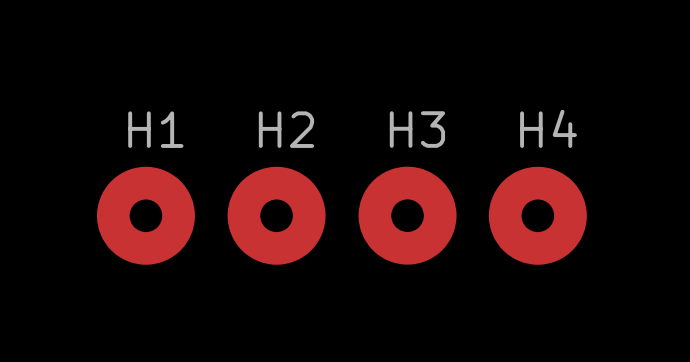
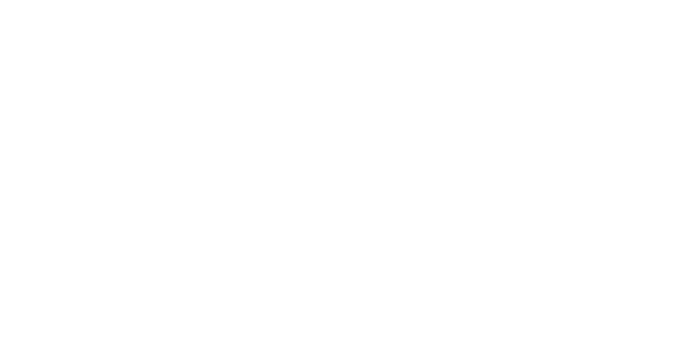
H1: (145, 215) -> none
H2: (276, 215) -> none
H3: (407, 215) -> none
H4: (537, 215) -> none

